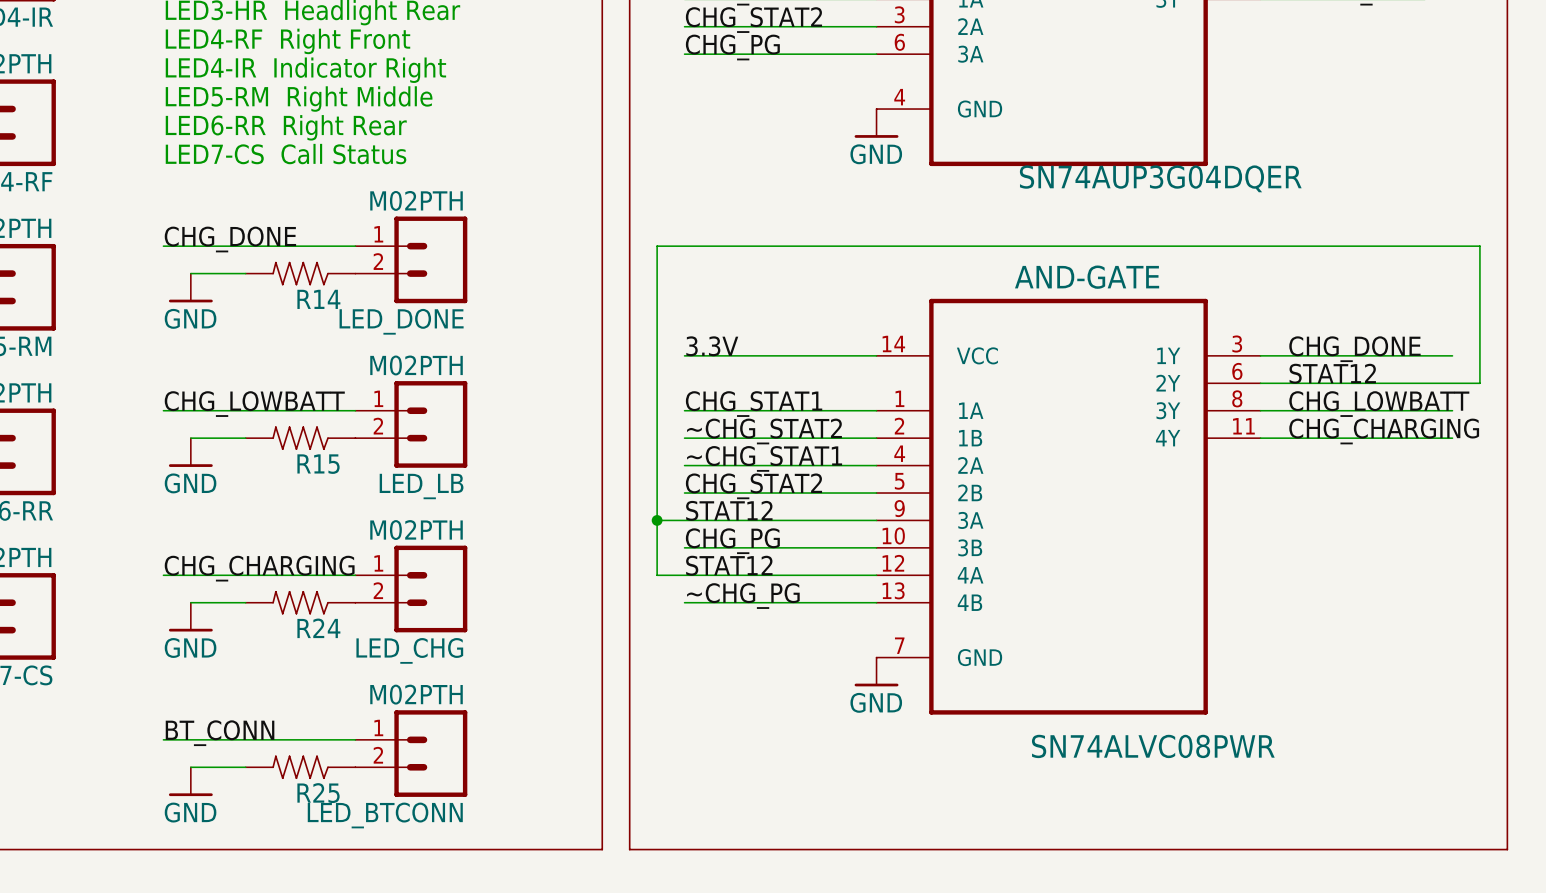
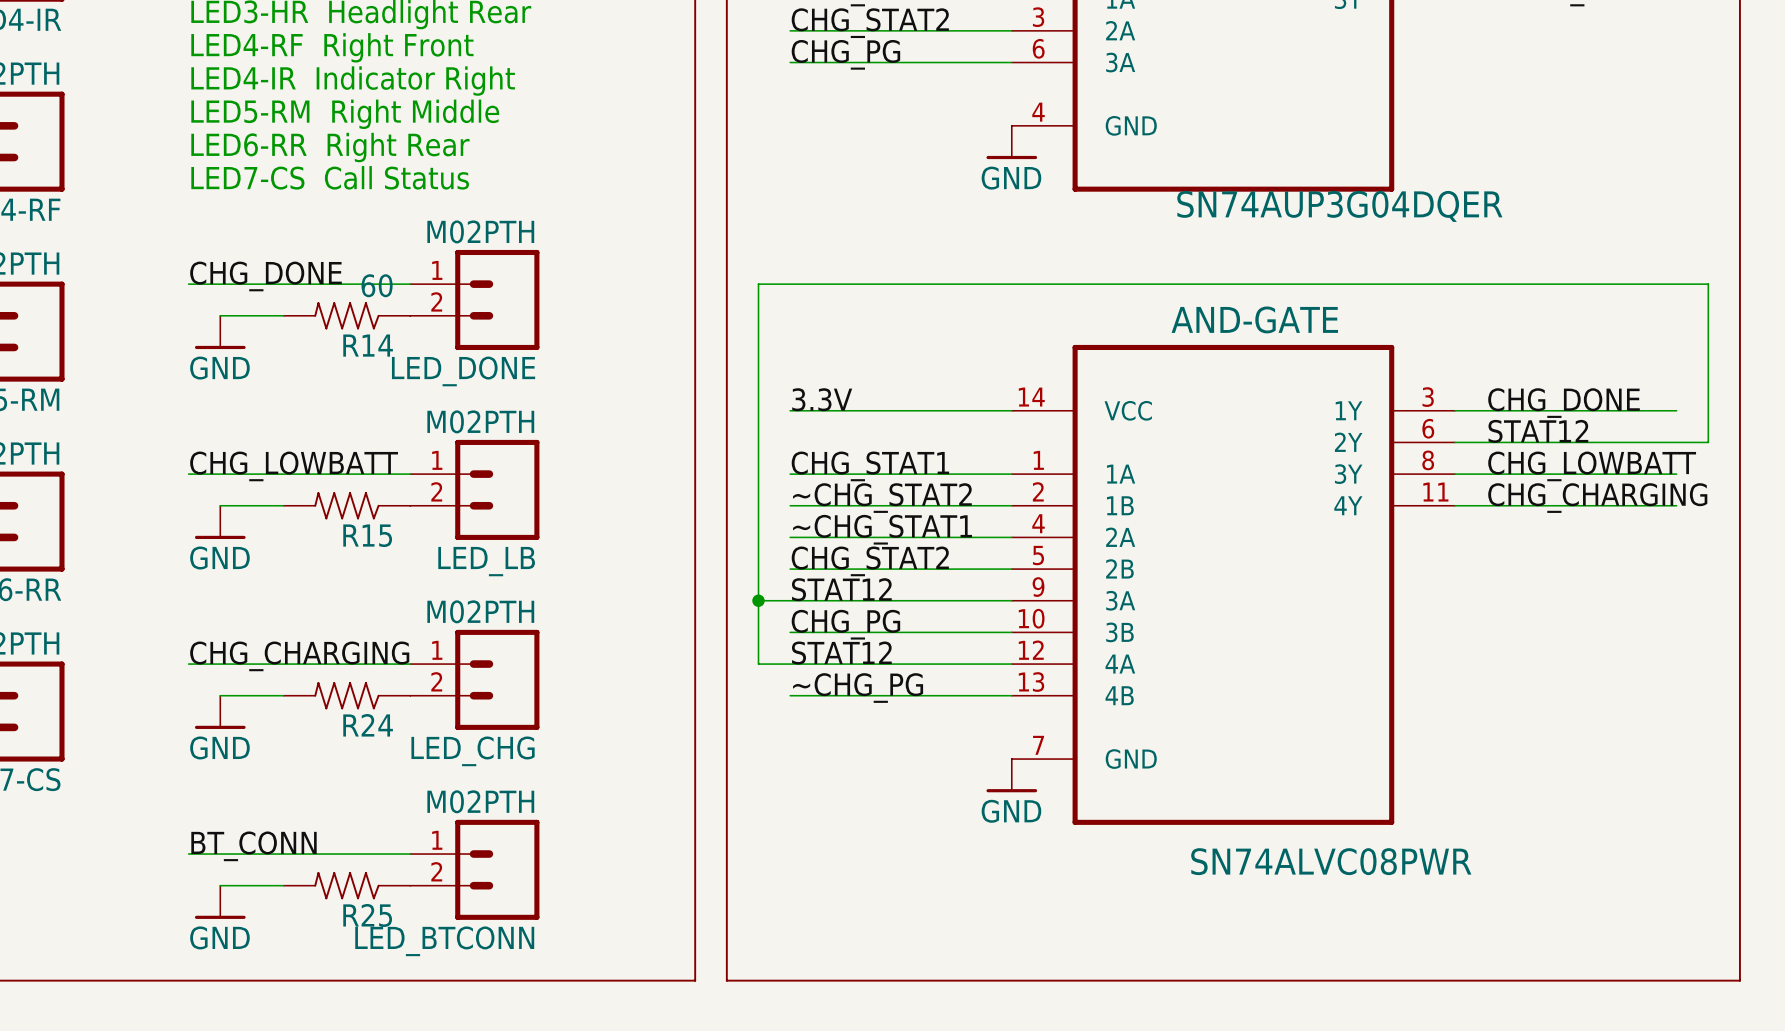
R14 value: none -> 60 (377, 285)

